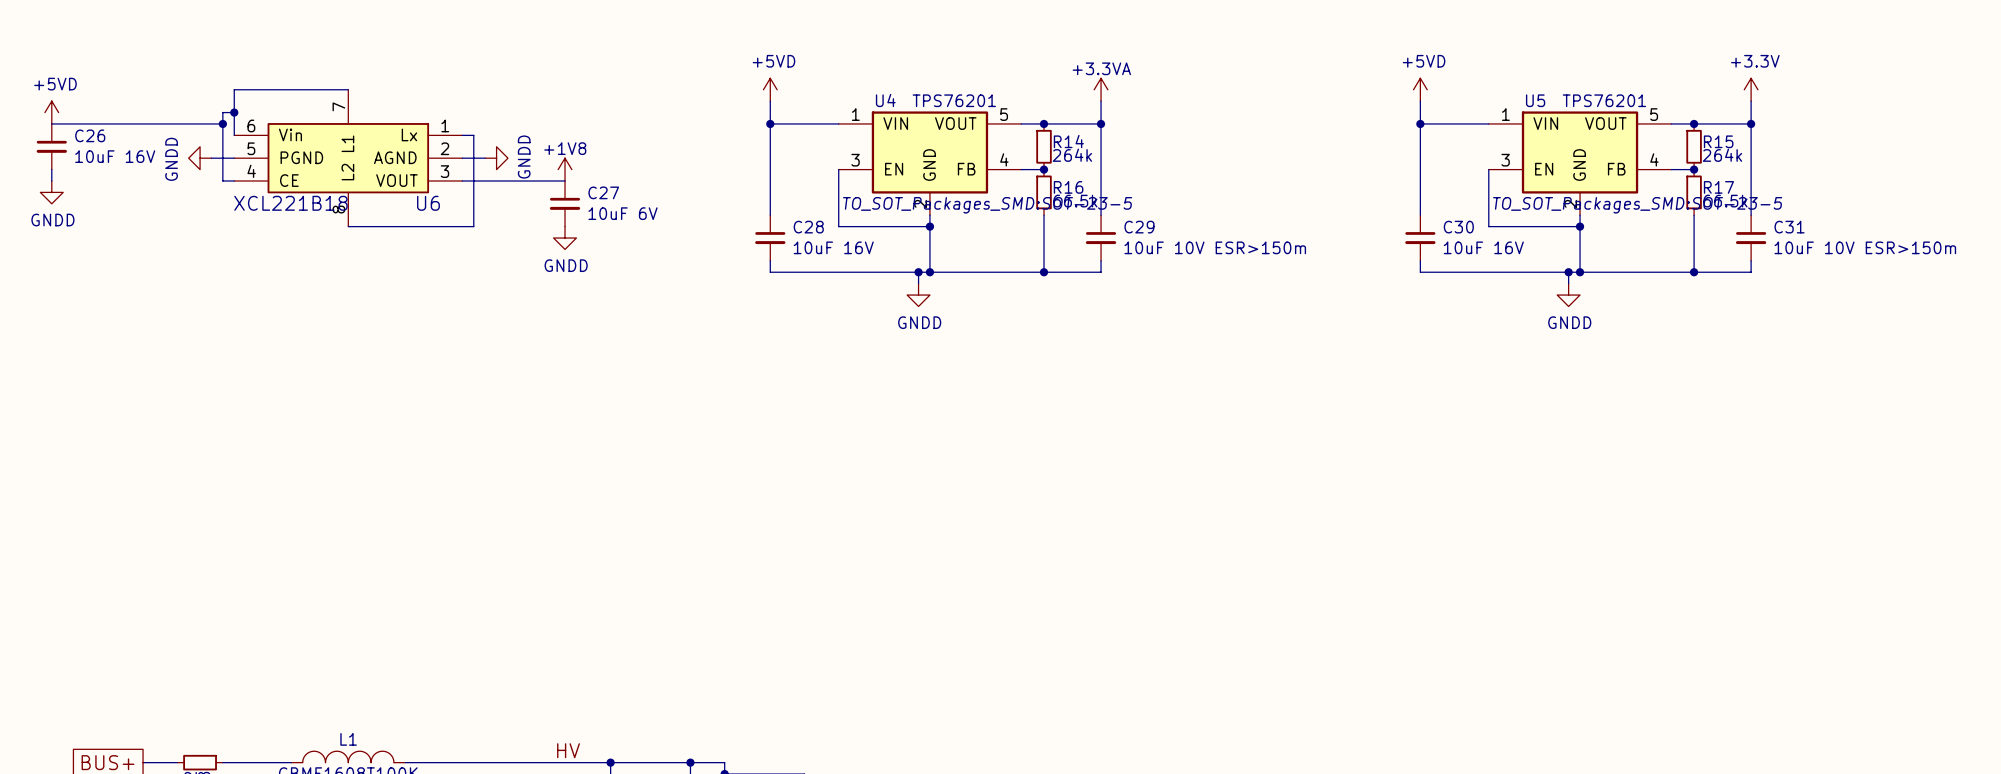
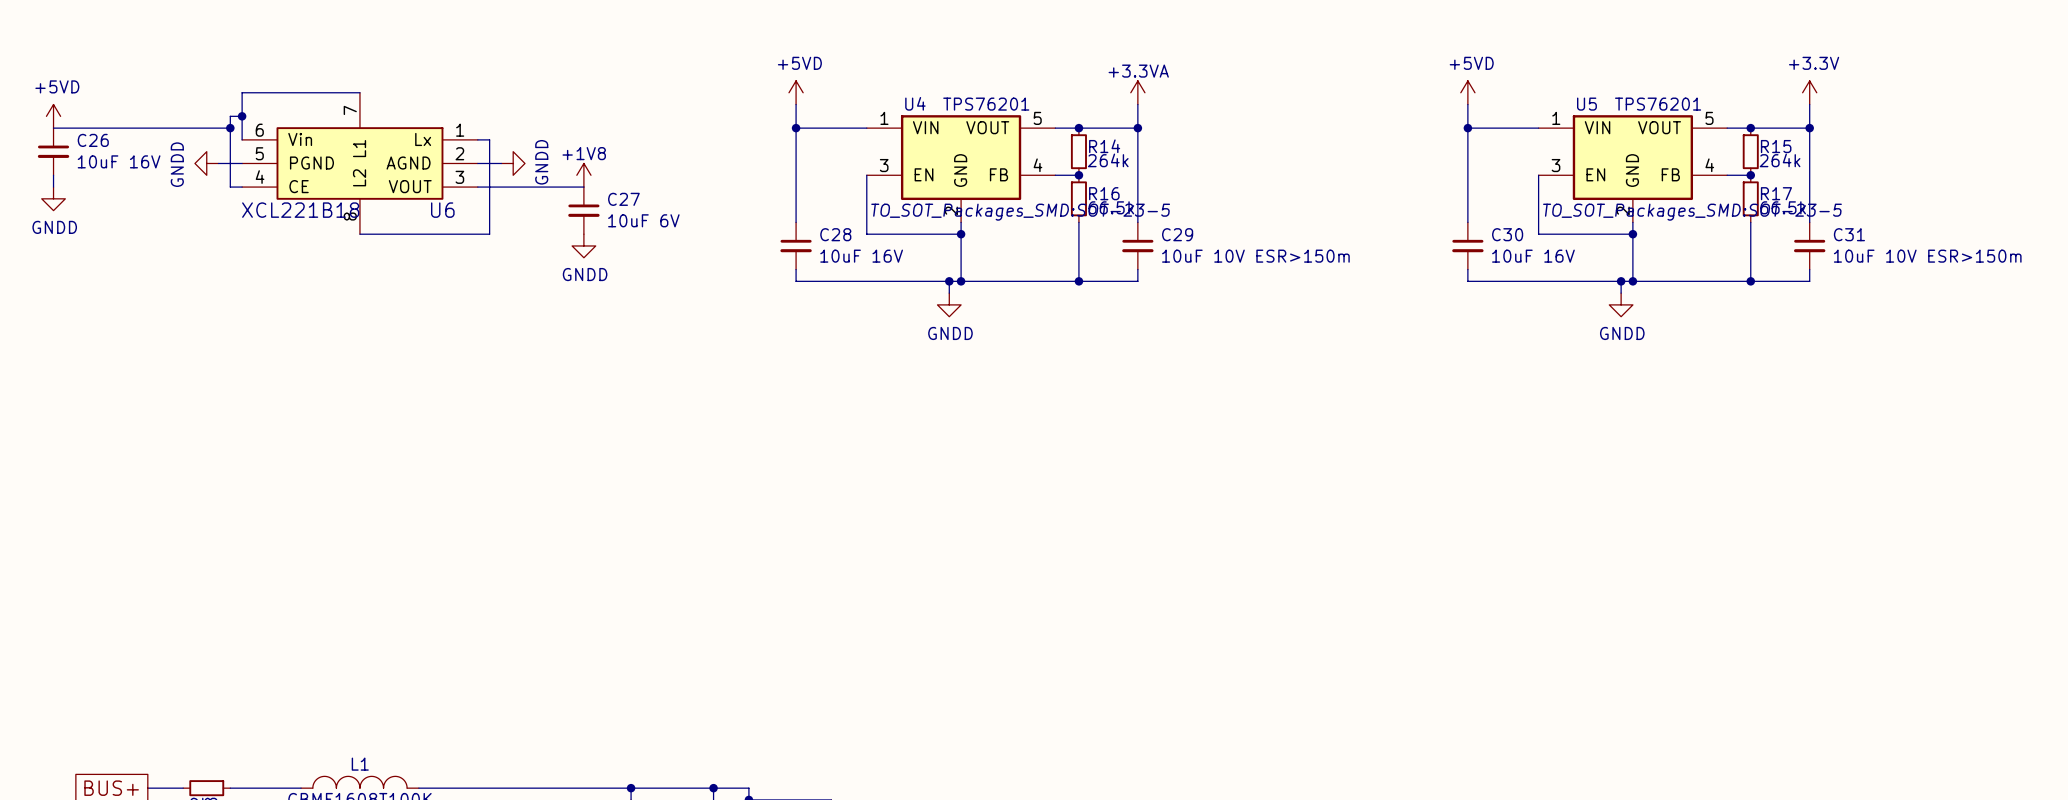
label: HV (568, 750) -> none

